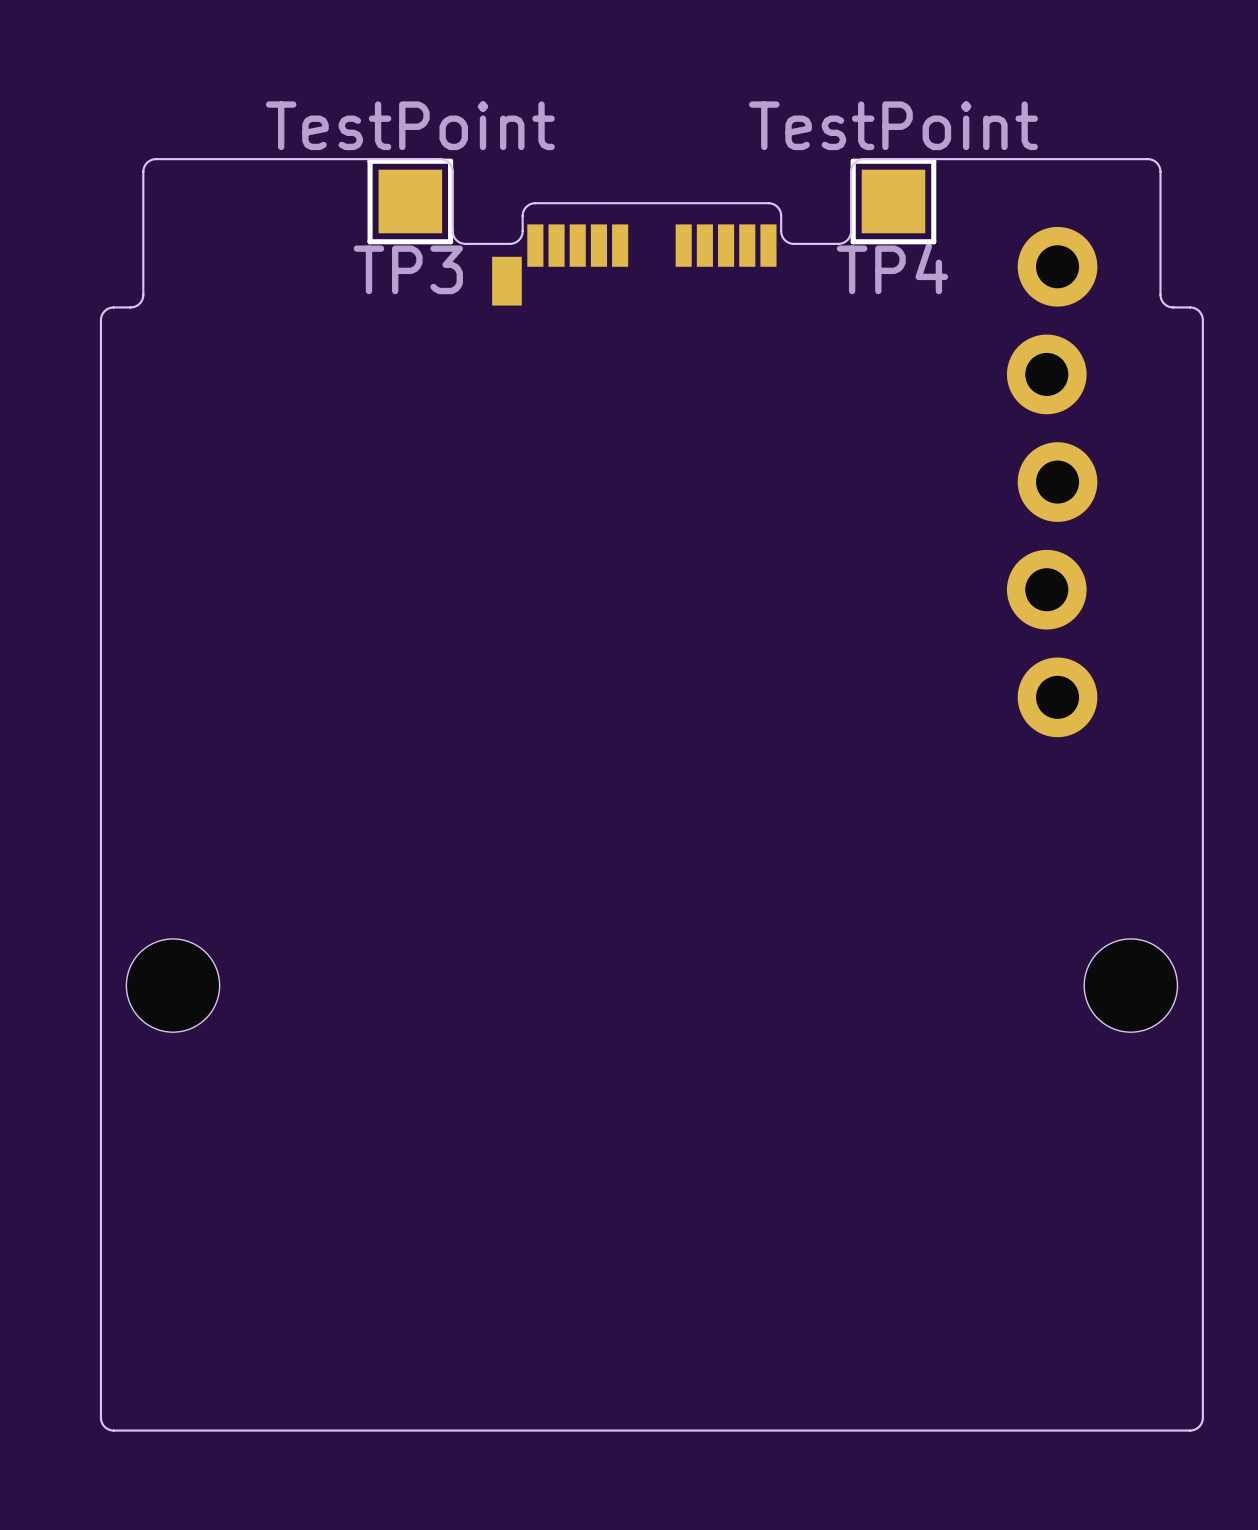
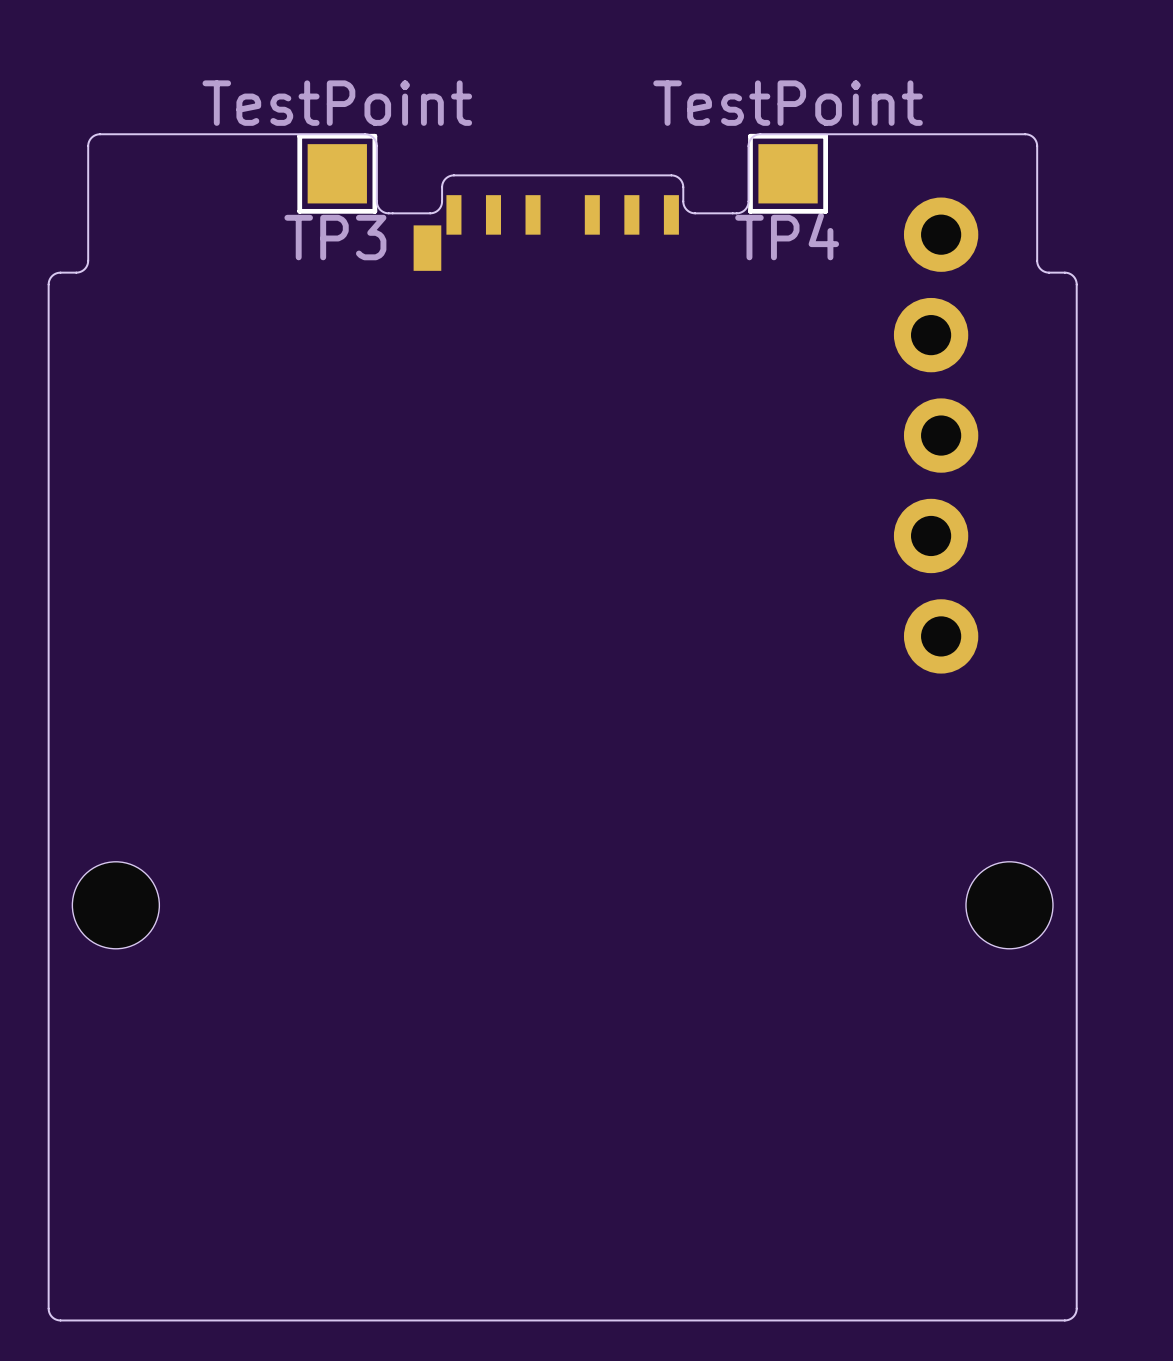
part footprint: [468, 202, 836, 306] -> [391, 174, 734, 271]

